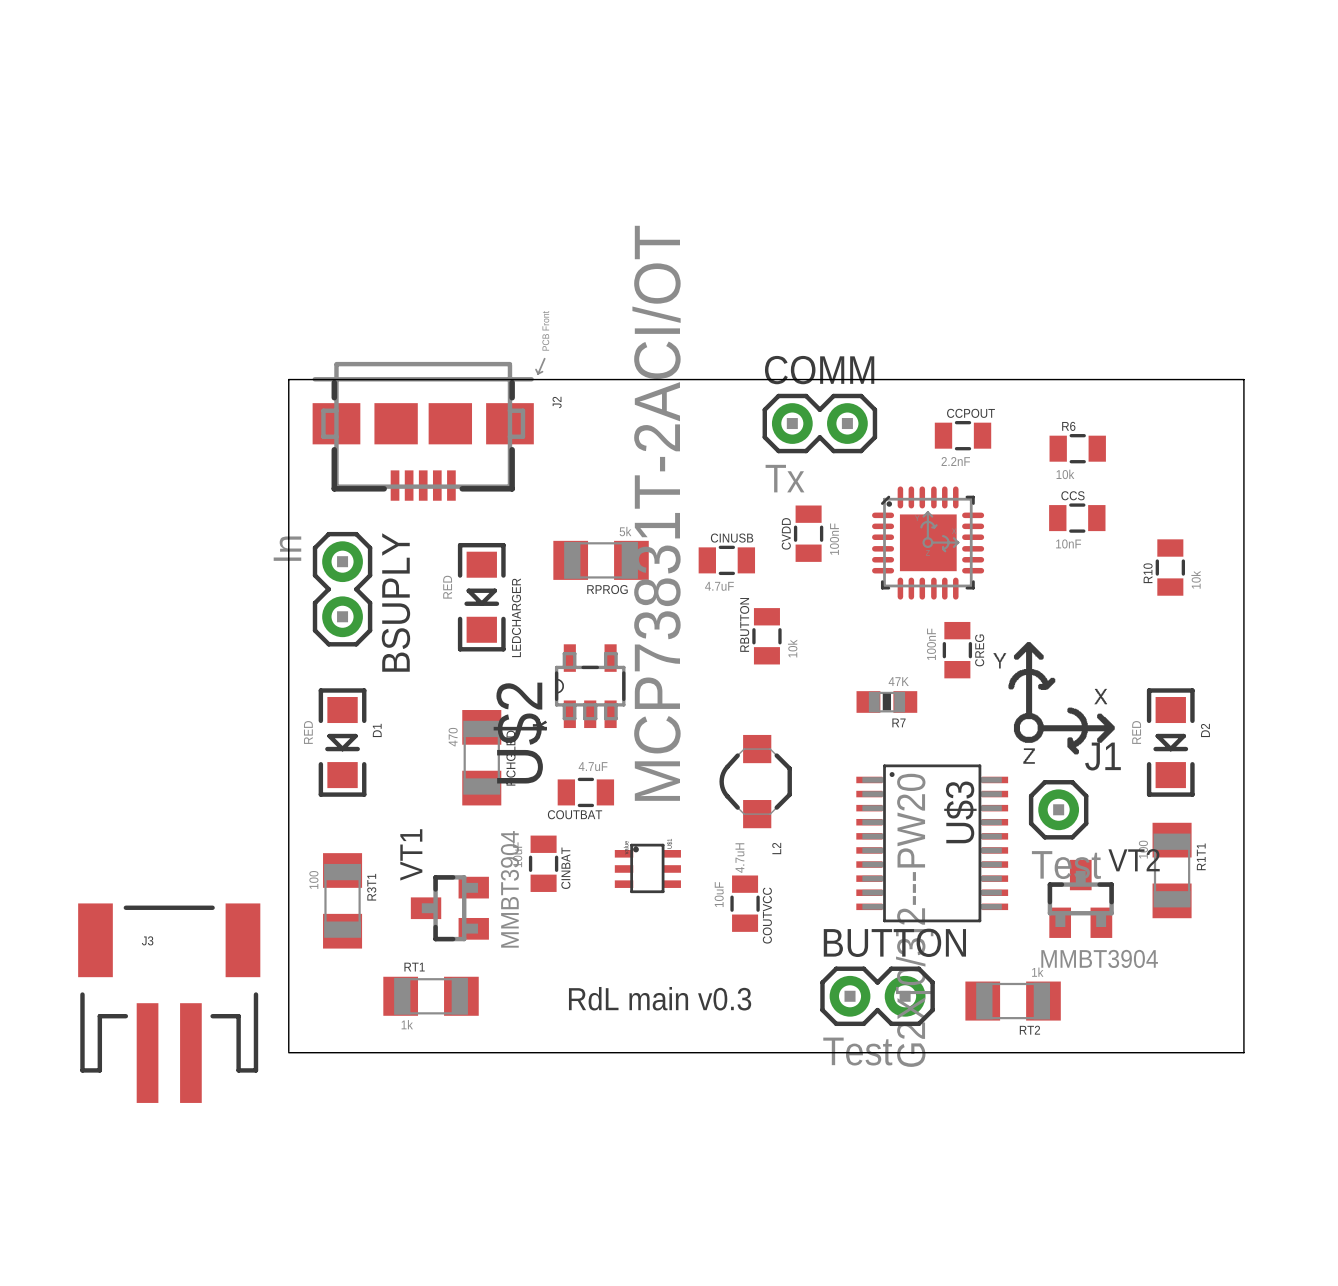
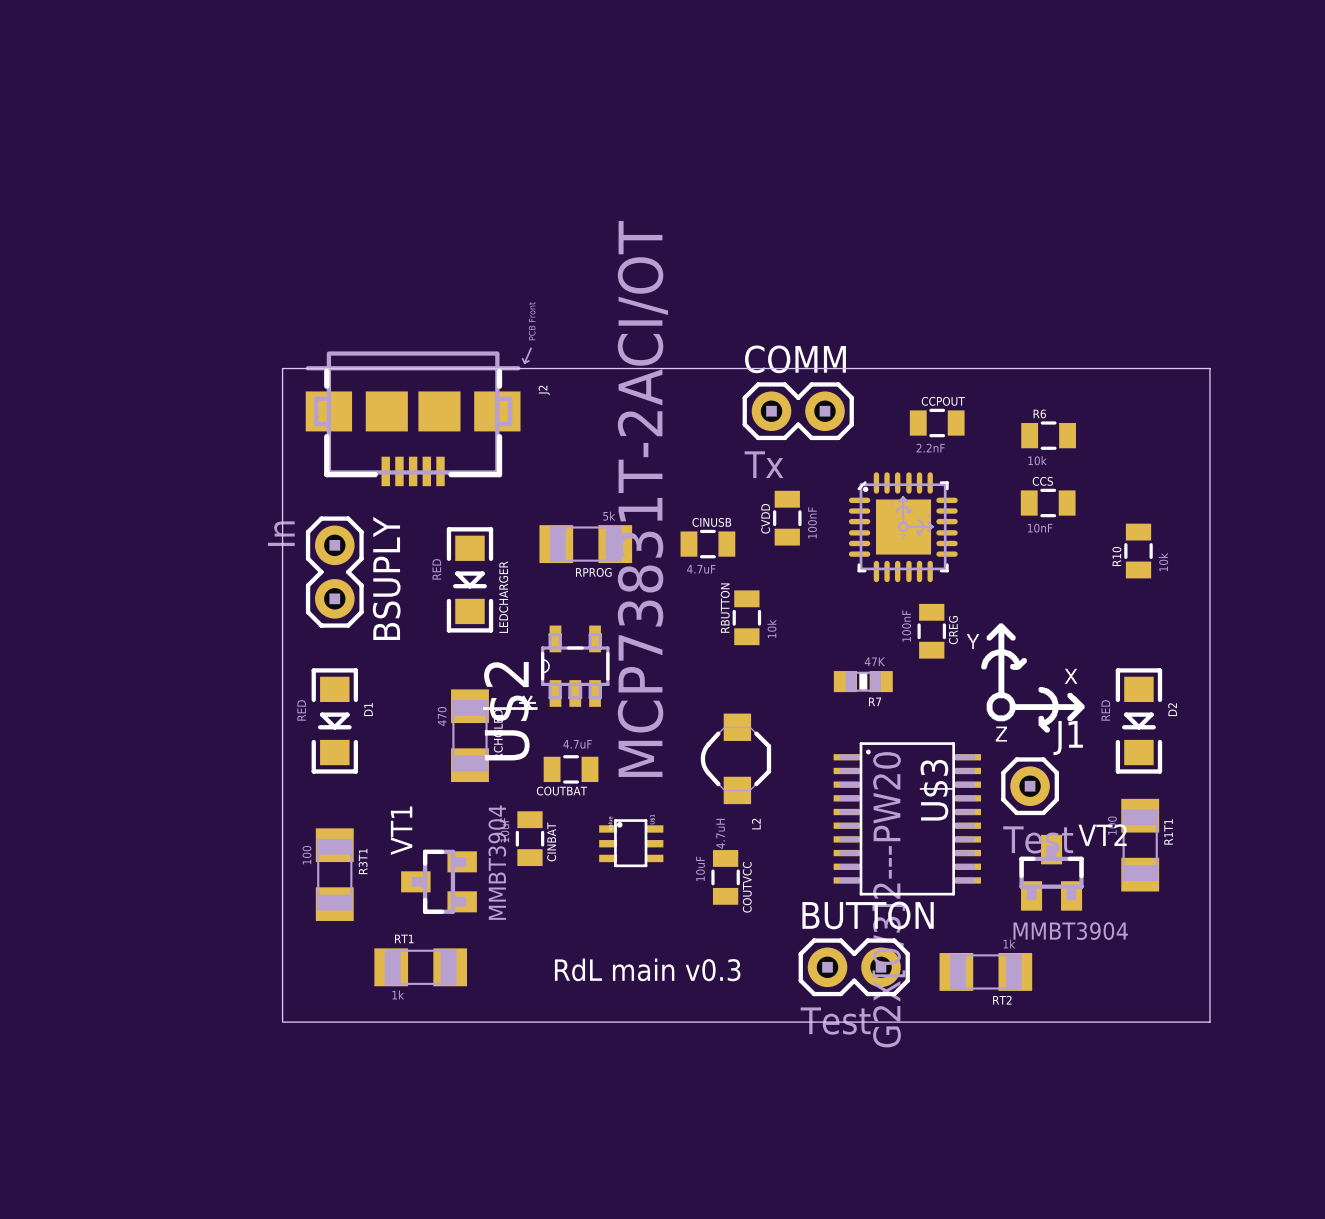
J3: (169, 1003) -> none

